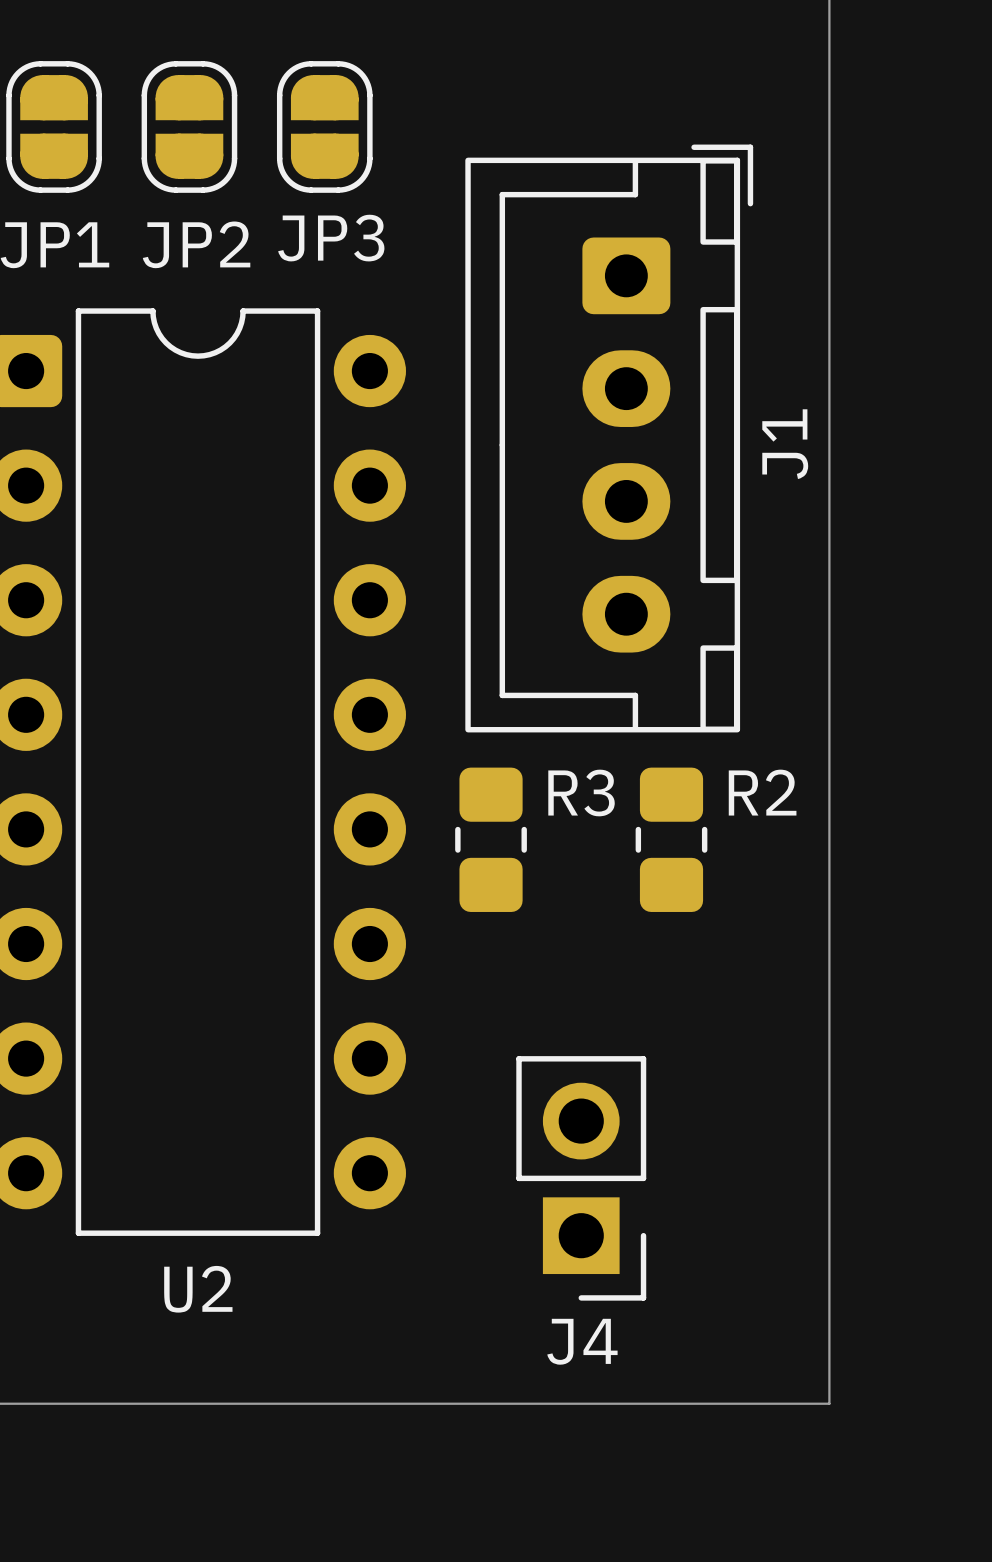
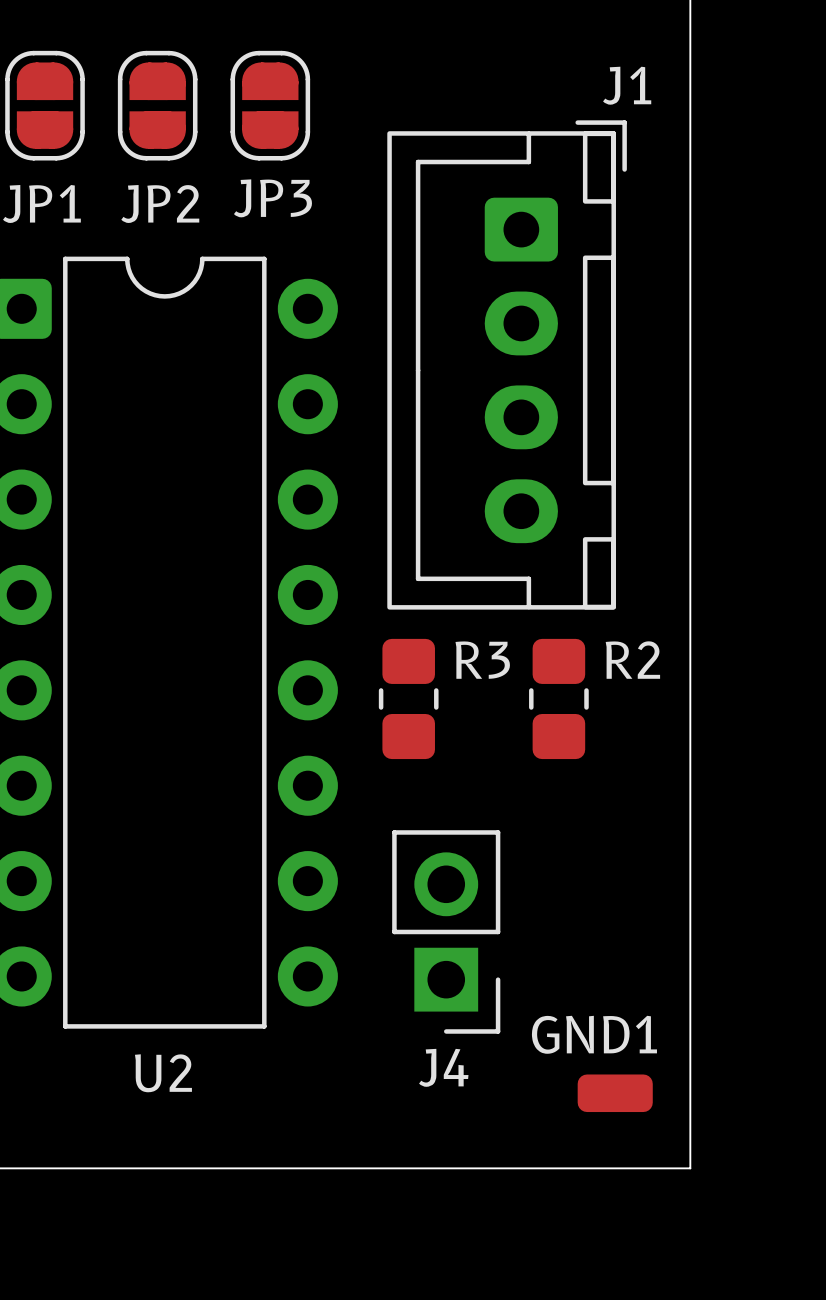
J1 name rotation: 0° (785, 444) -> 90° clockwise (627, 85)
J1 name position: J1 (785, 444) -> J1 (627, 85)
J4 position: (581, 1178) -> (446, 931)
GND1: none -> (615, 1093)

